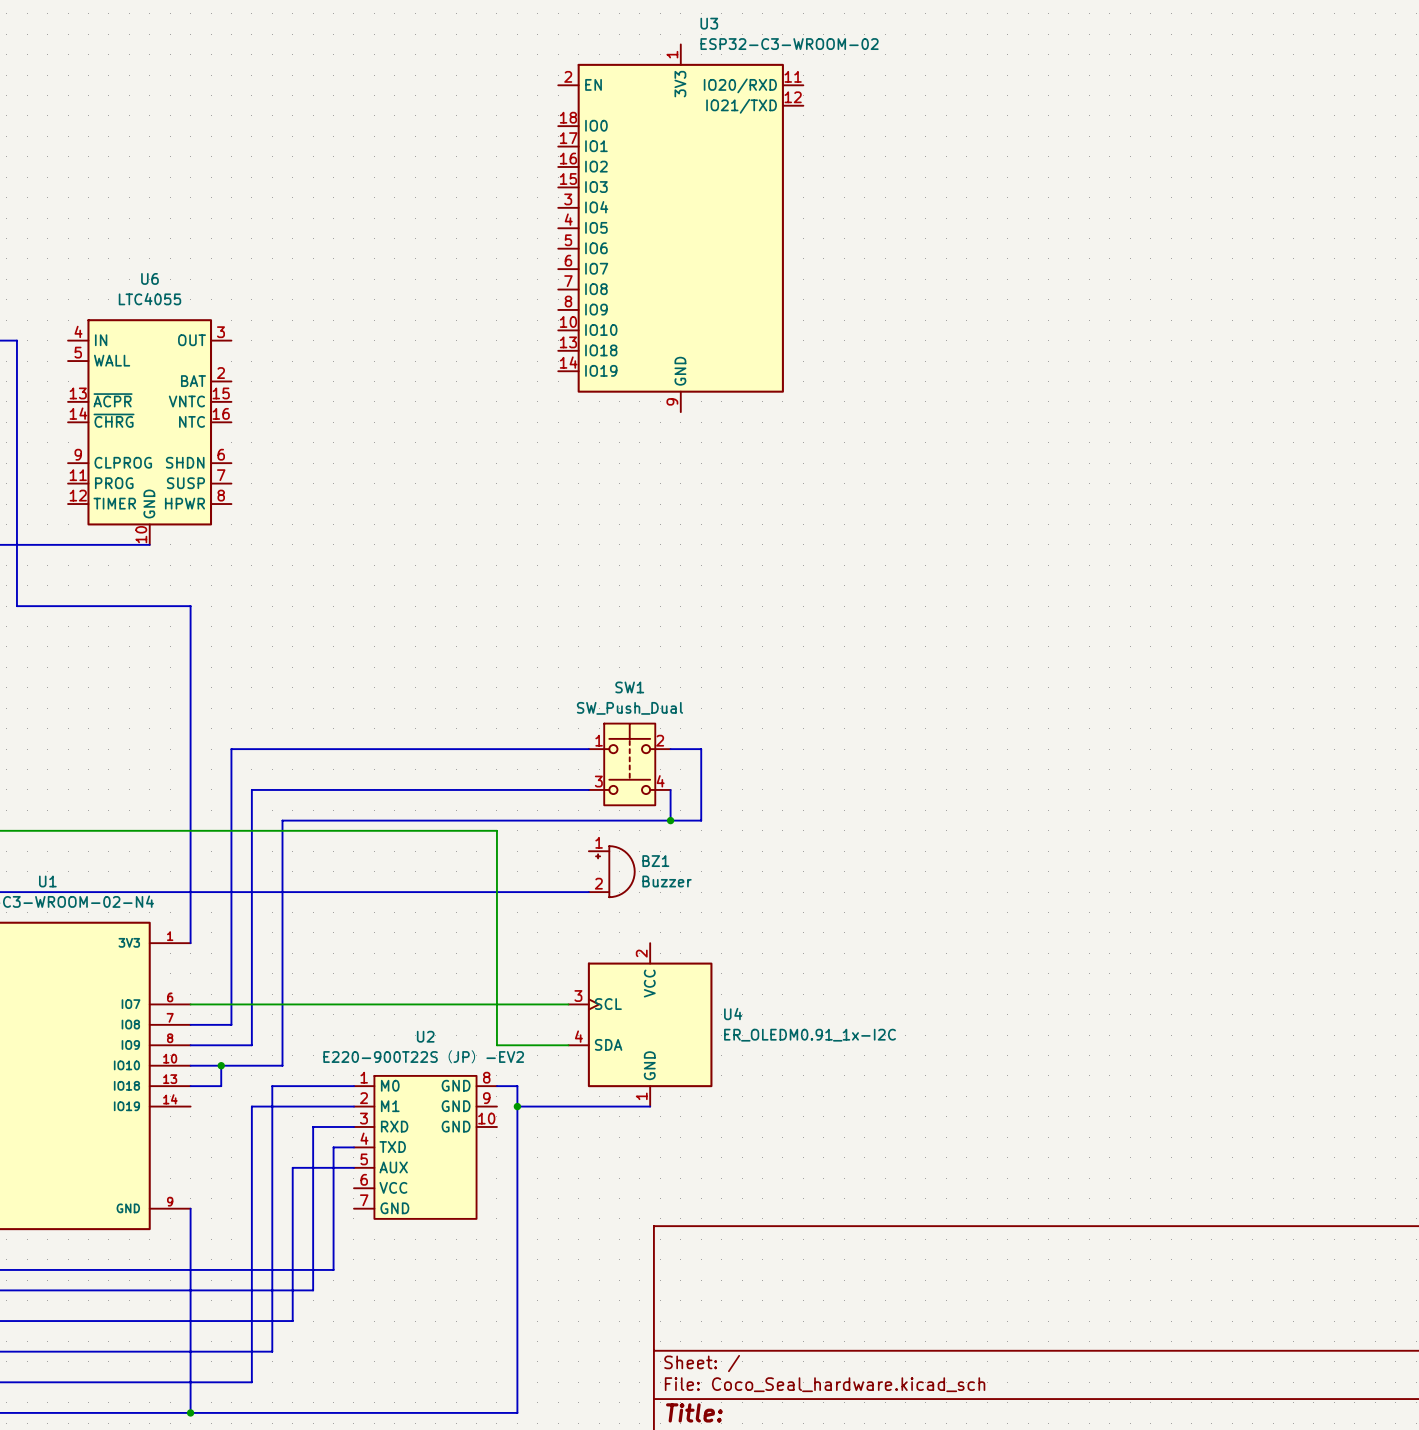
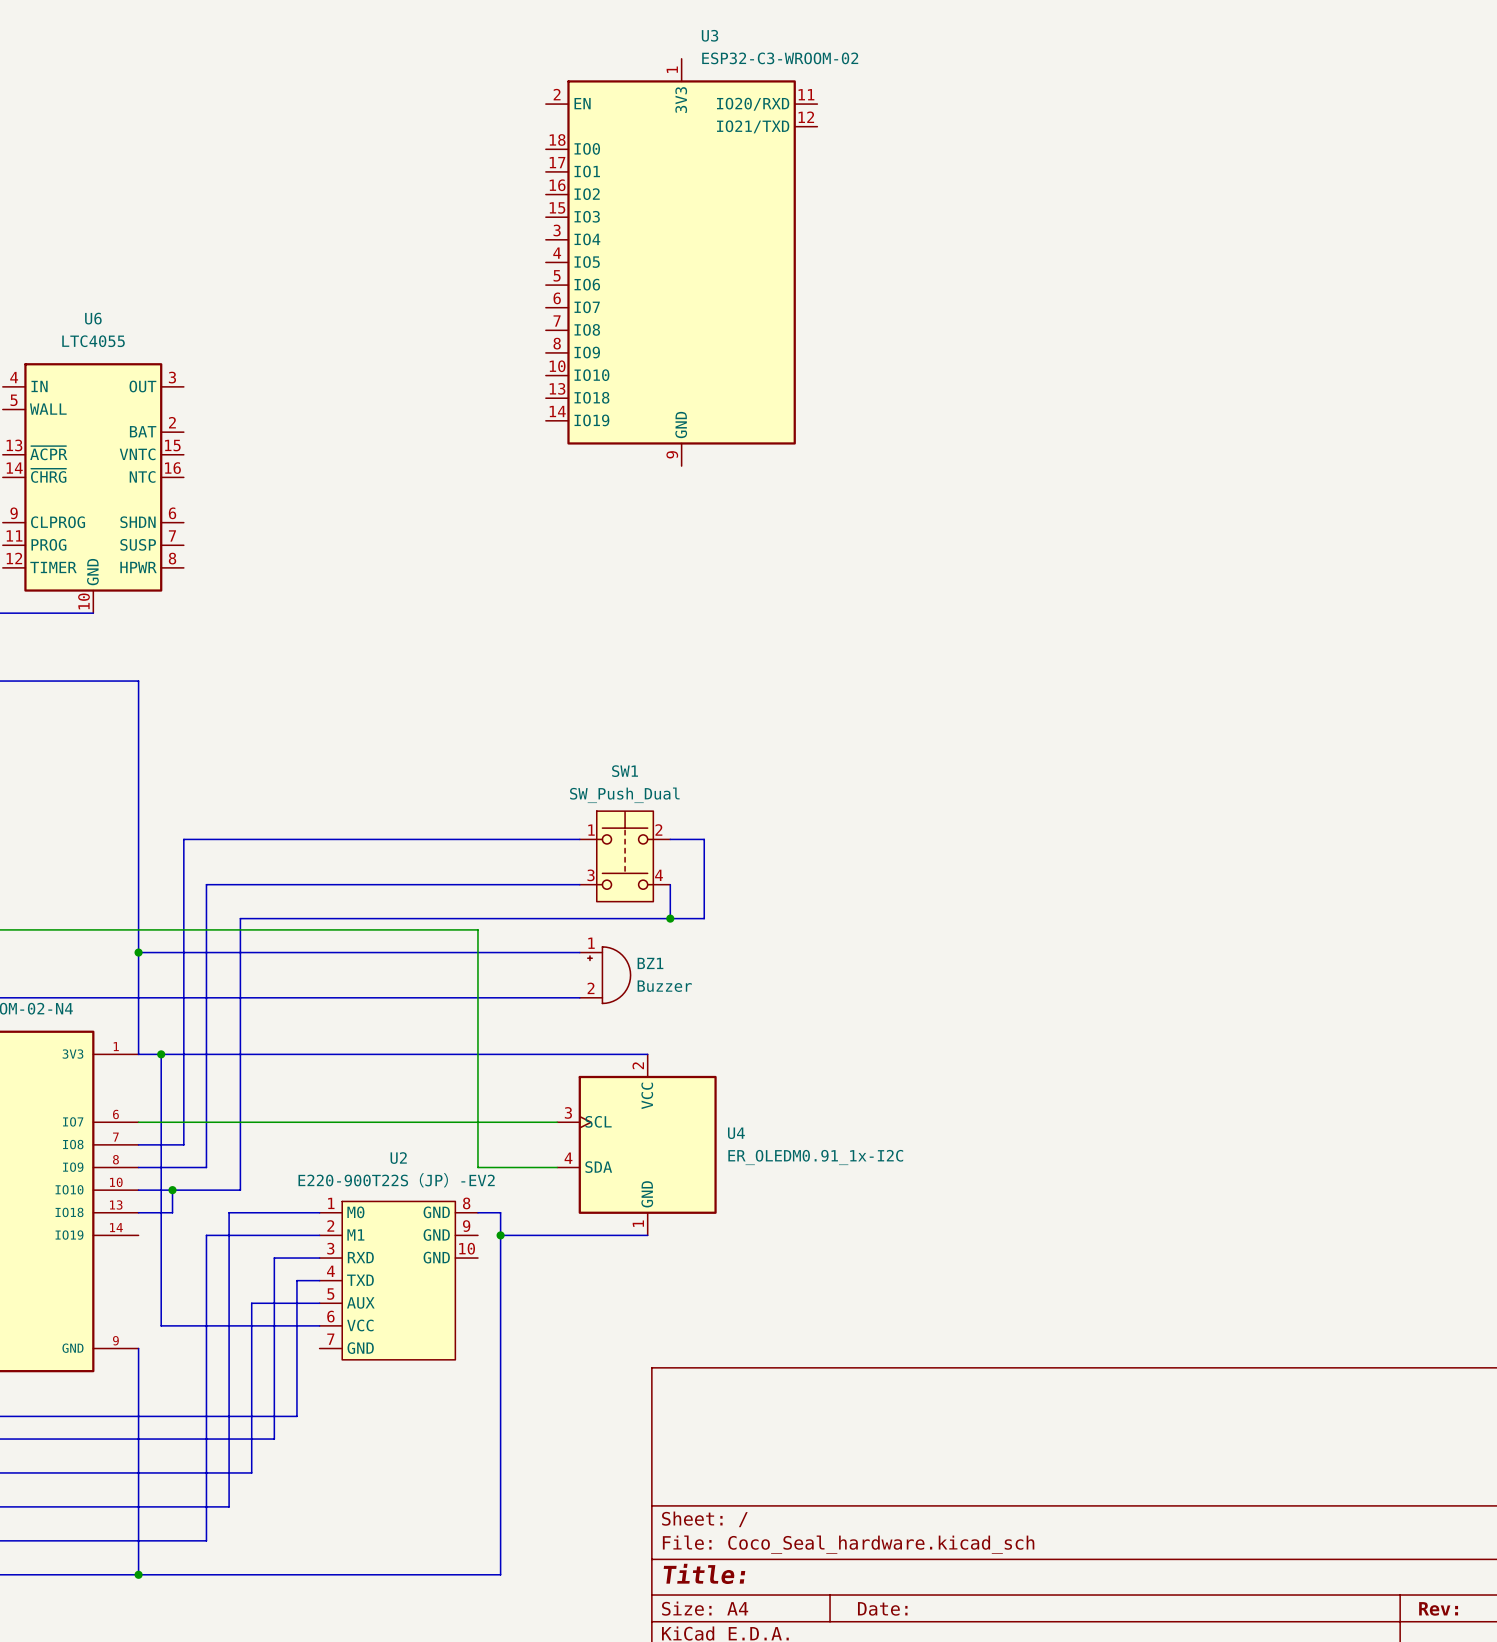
bus: none -> (138, 952) (579, 952)
junction: none -> (138, 952)
bus: none -> (138, 1054) (647, 1054)
bus: none -> (161, 1054) (161, 1325) (319, 1325)
junction: none -> (161, 1054)

